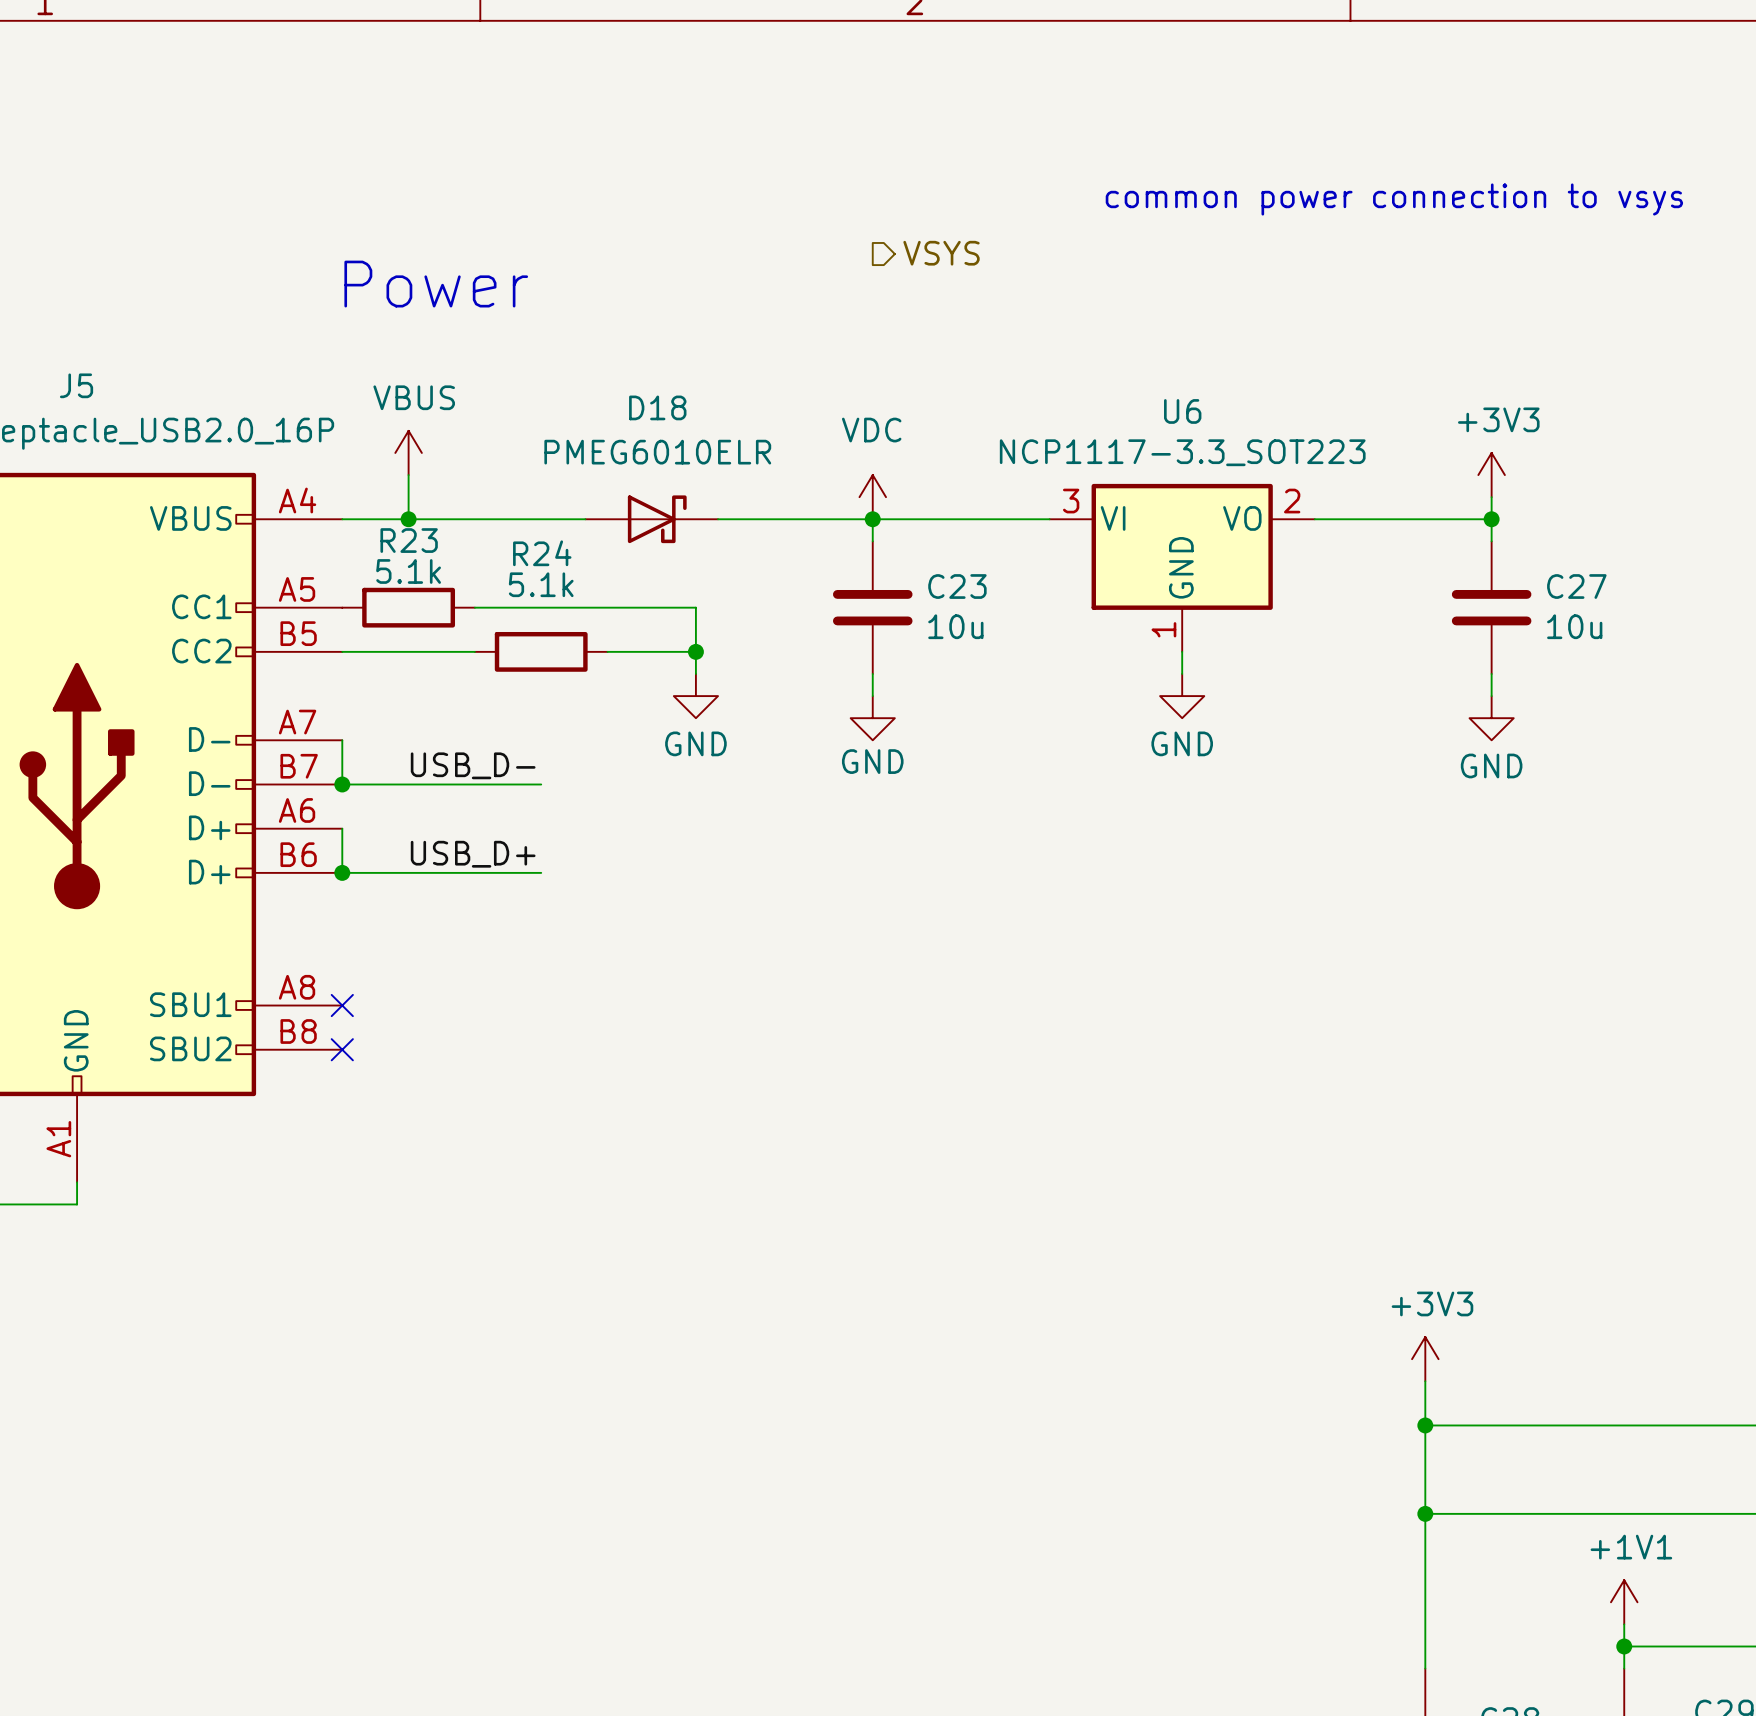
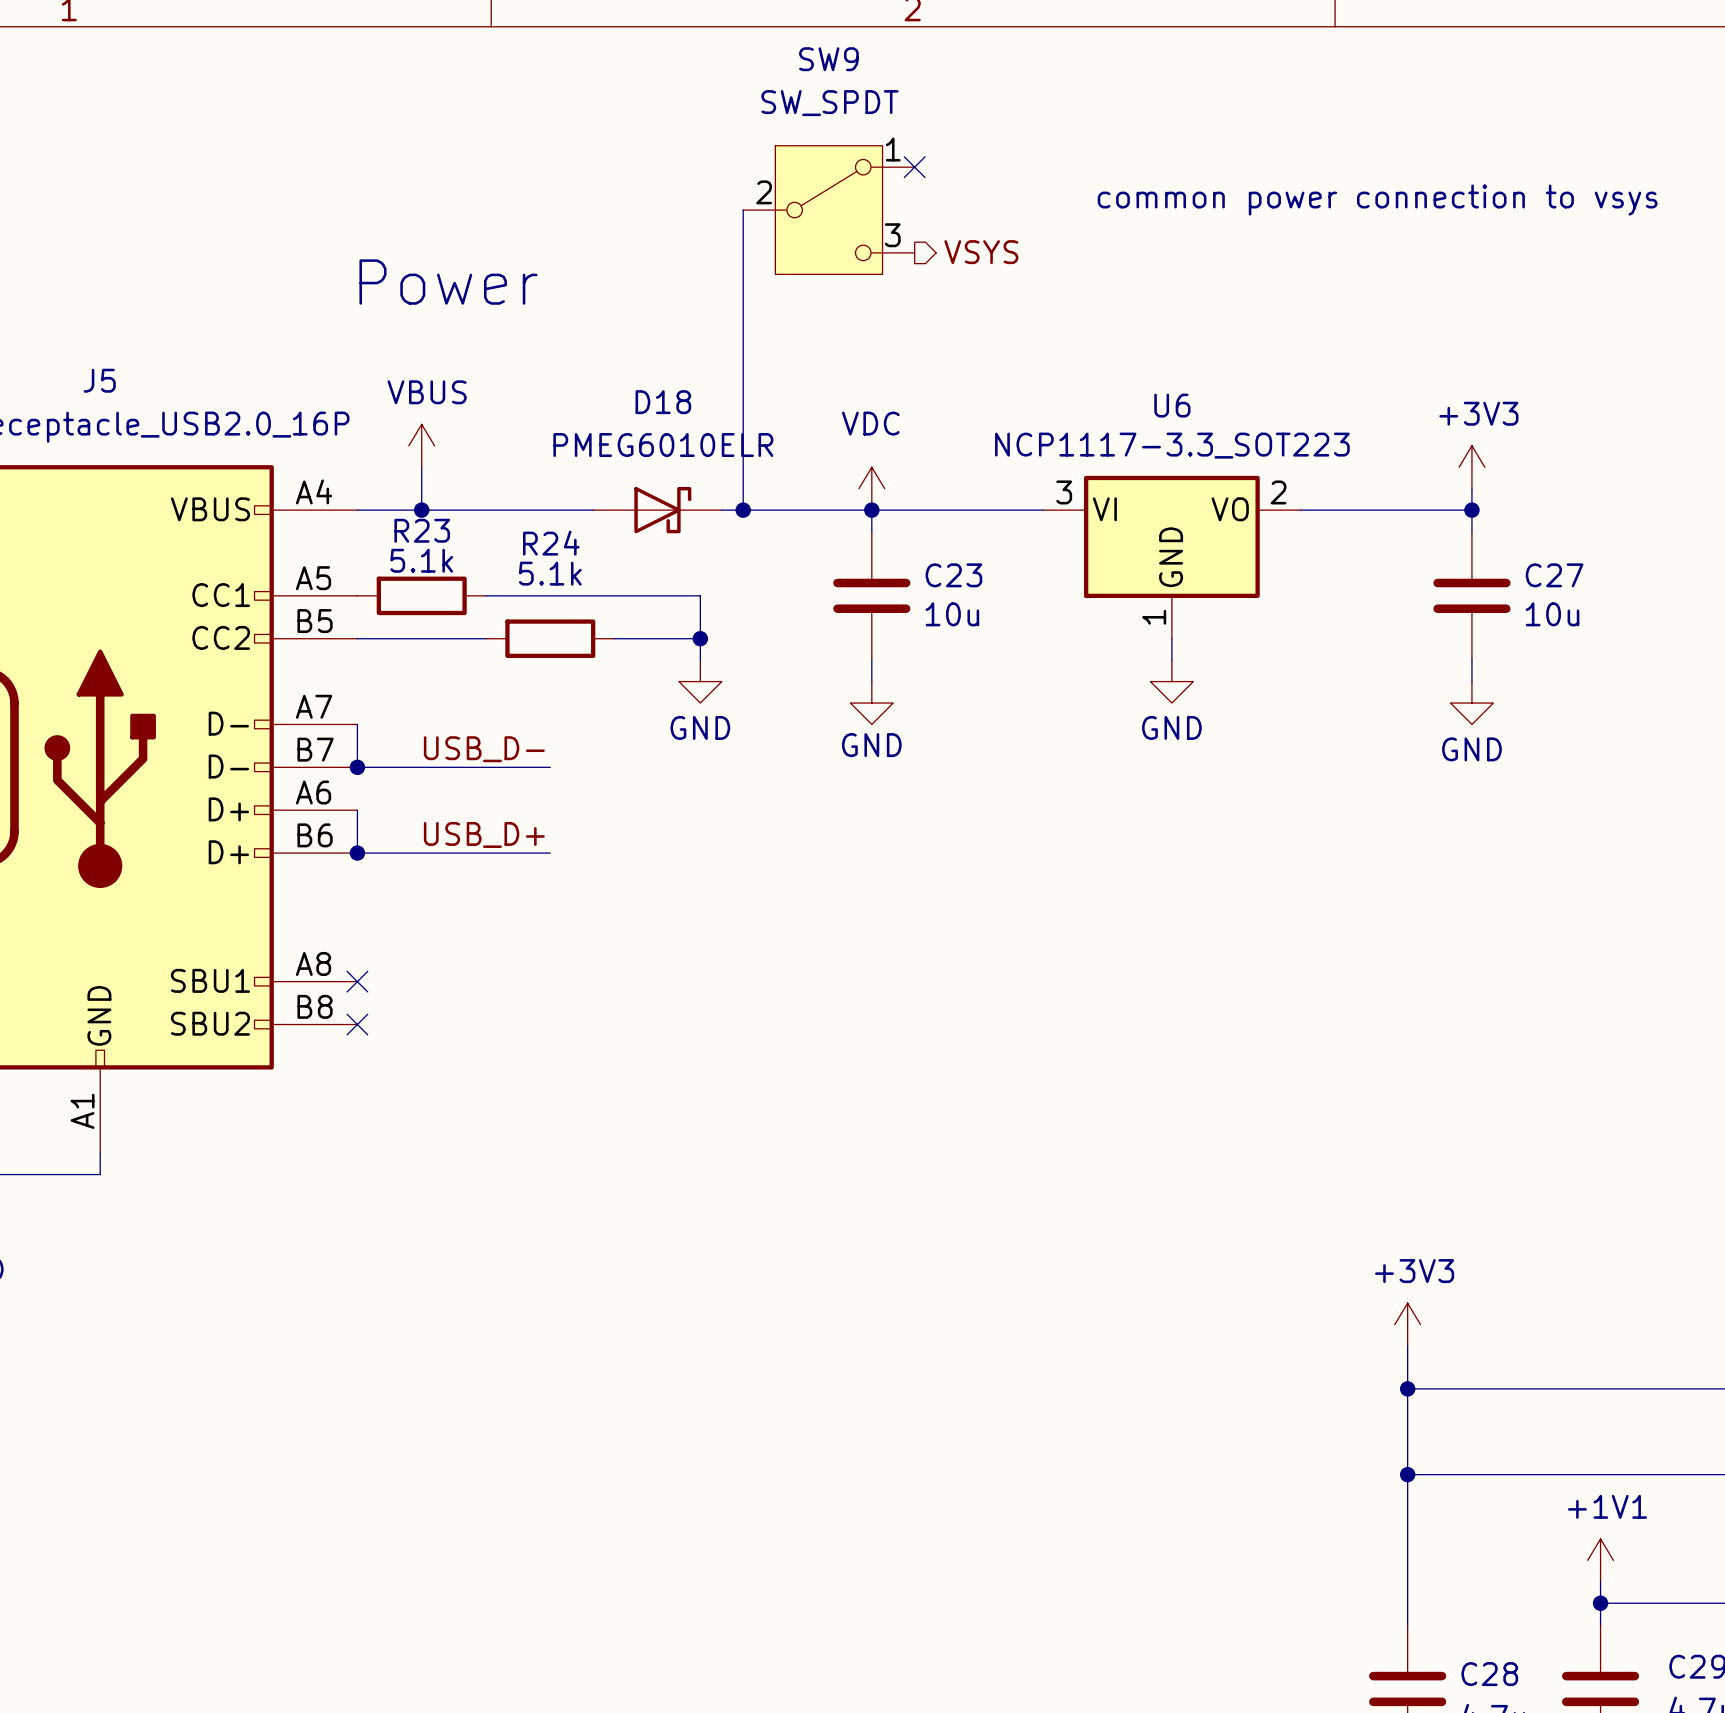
no-connect mark: none -> (914, 167)
wire: none -> (743, 210) (743, 510)
SW9: none -> SW_SPDT (828, 210)
hierarchical label position: VSYS (941, 253) -> VSYS (981, 252)
junction: none -> (743, 510)

